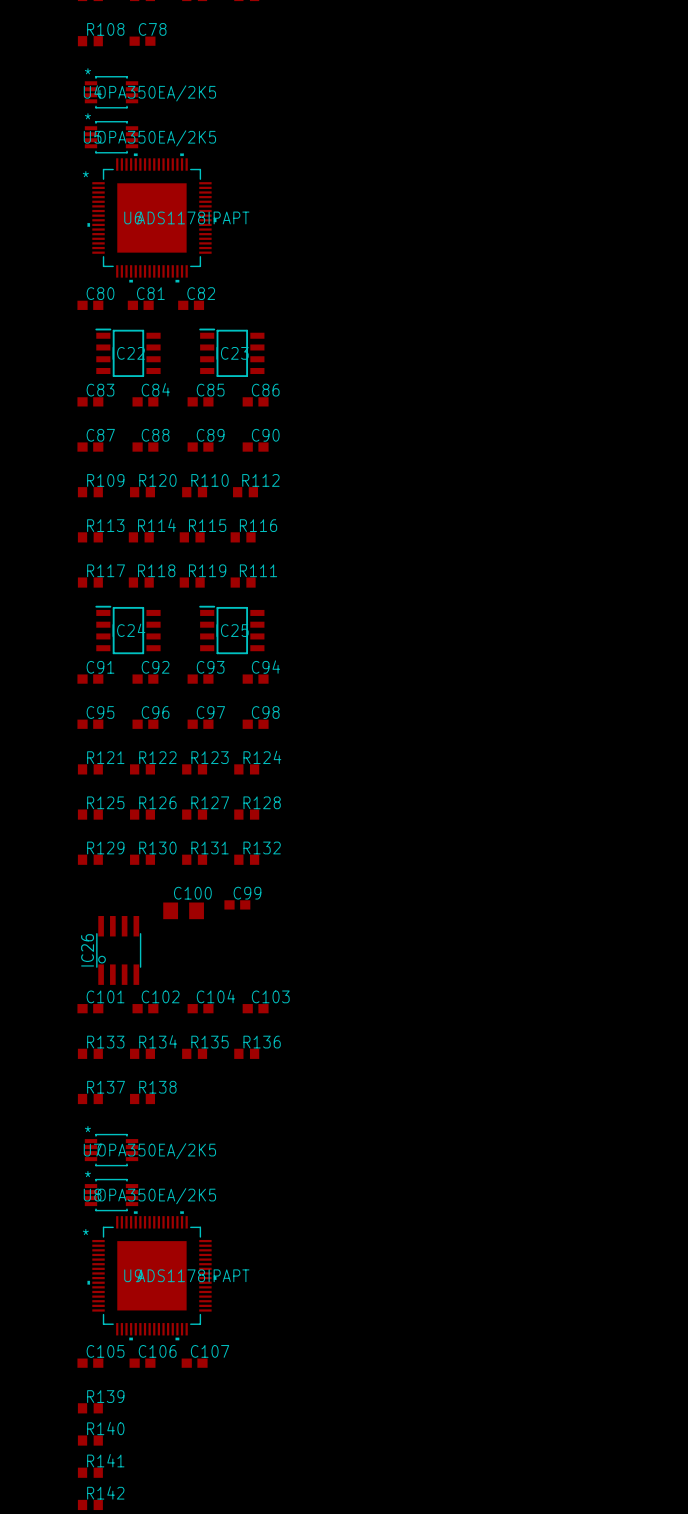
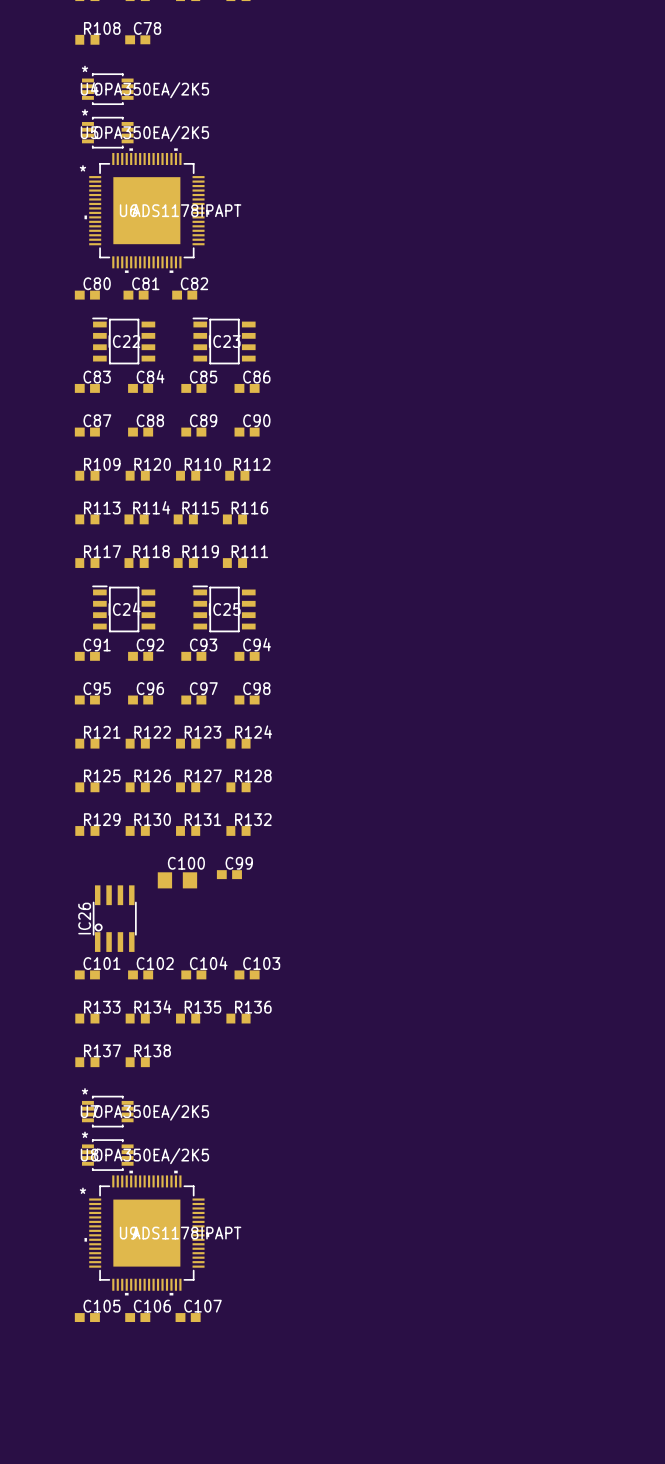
R139: (90, 1408) -> none
R140: (90, 1440) -> none
R141: (90, 1472) -> none
R142: (90, 1504) -> none

